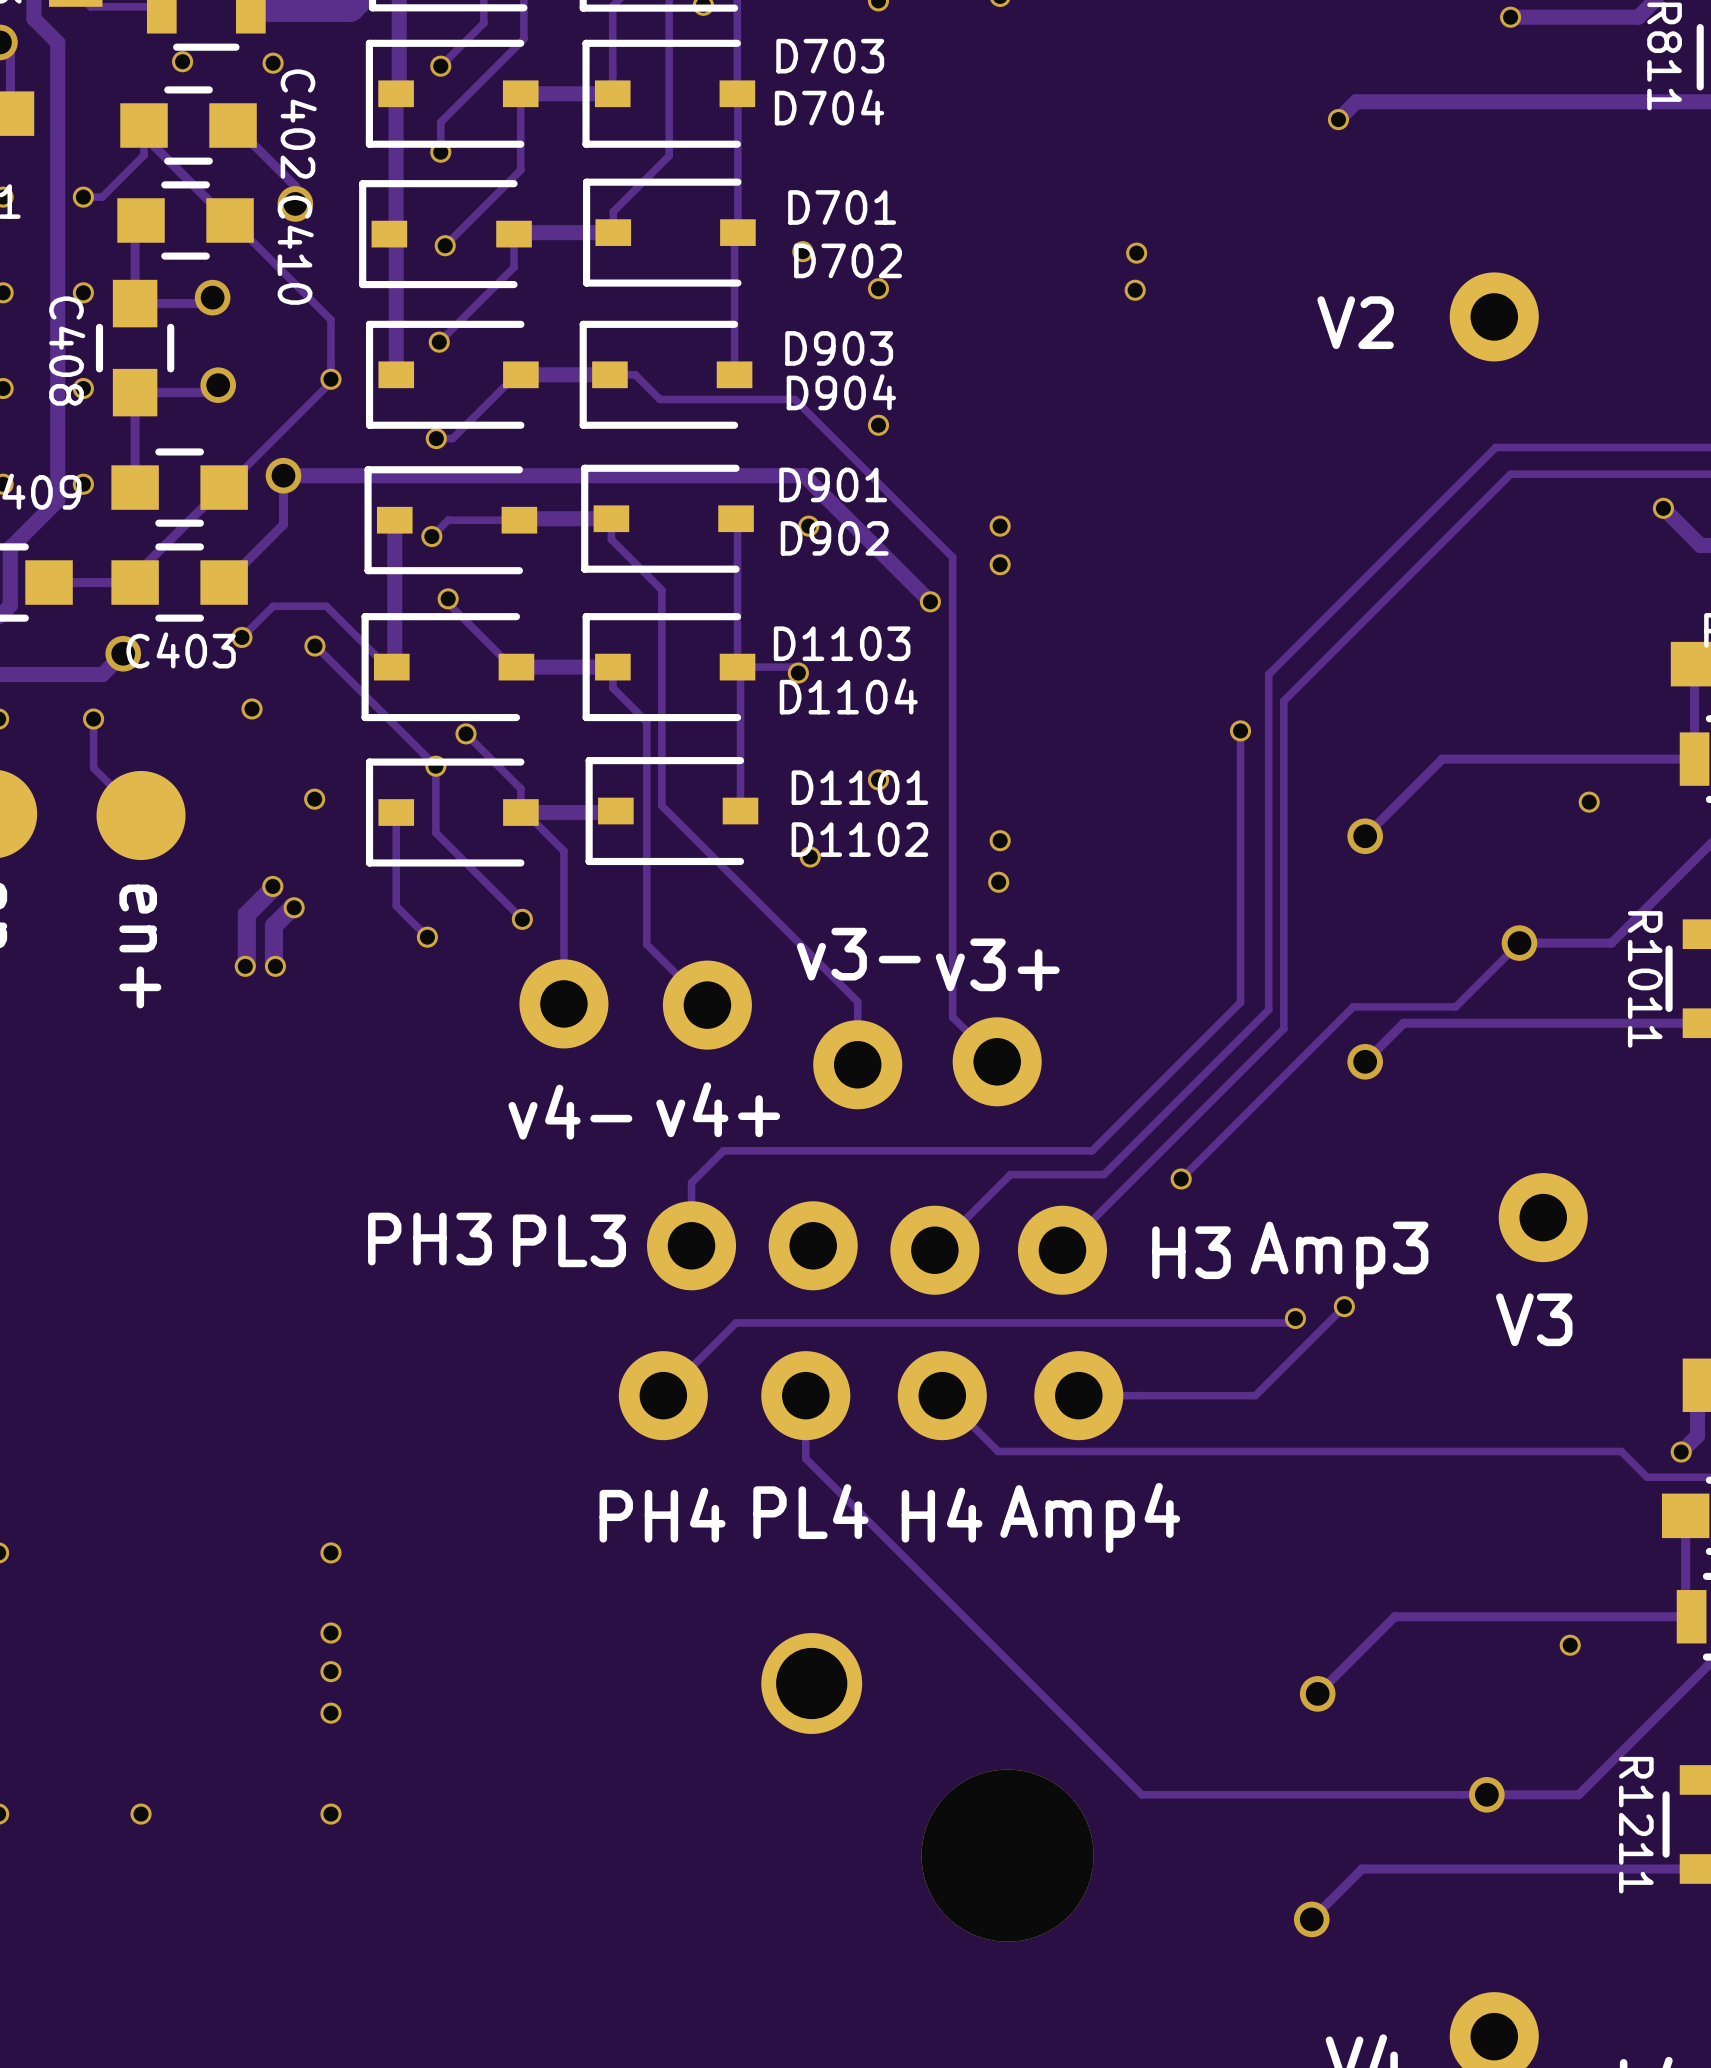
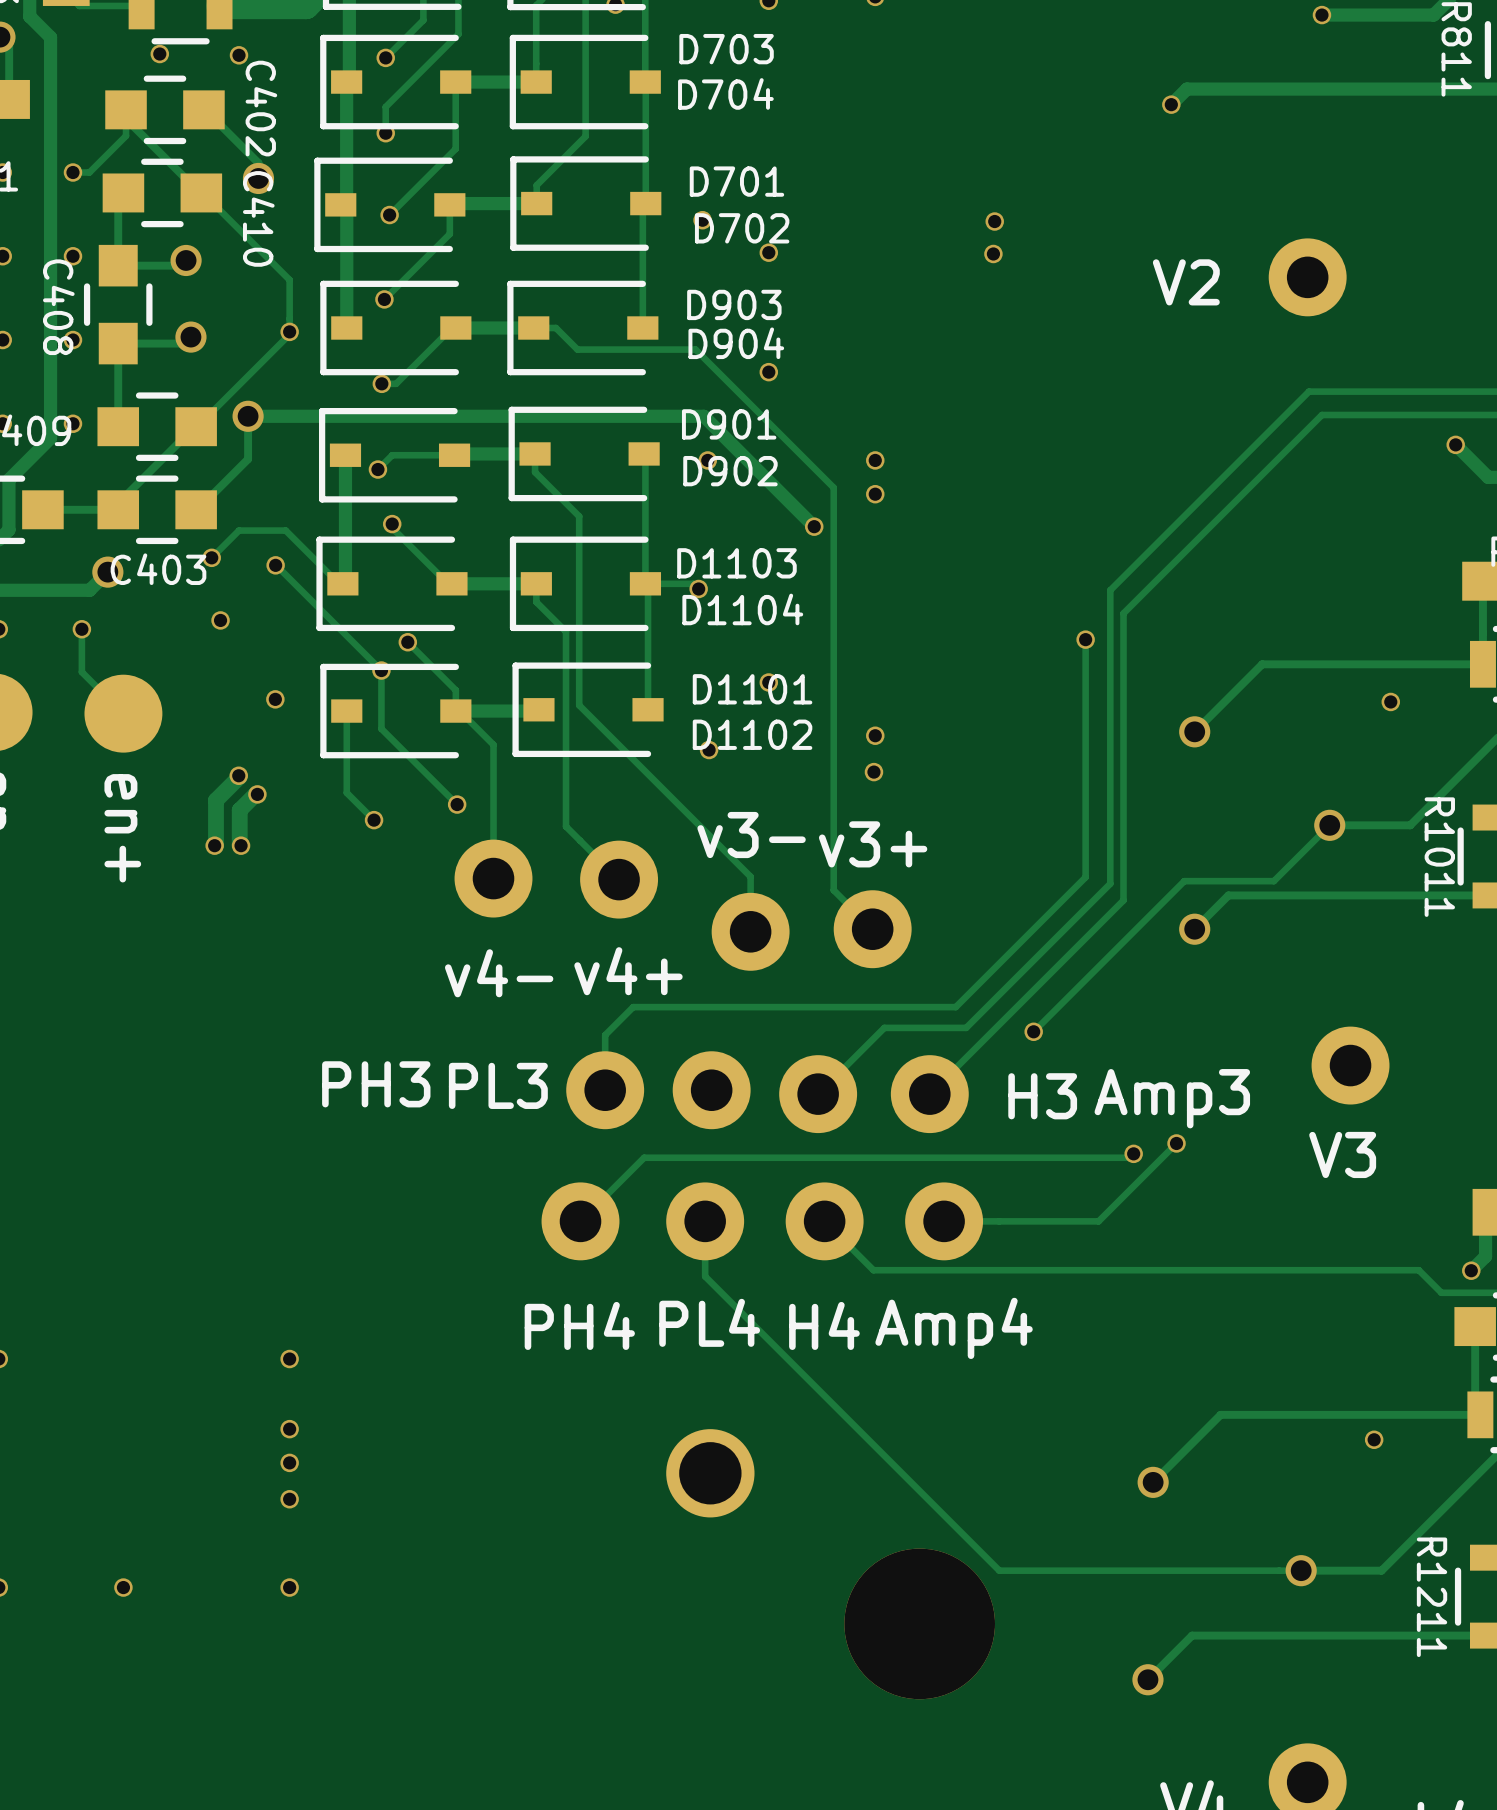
part position: (1007, 1855) -> (919, 1623)

